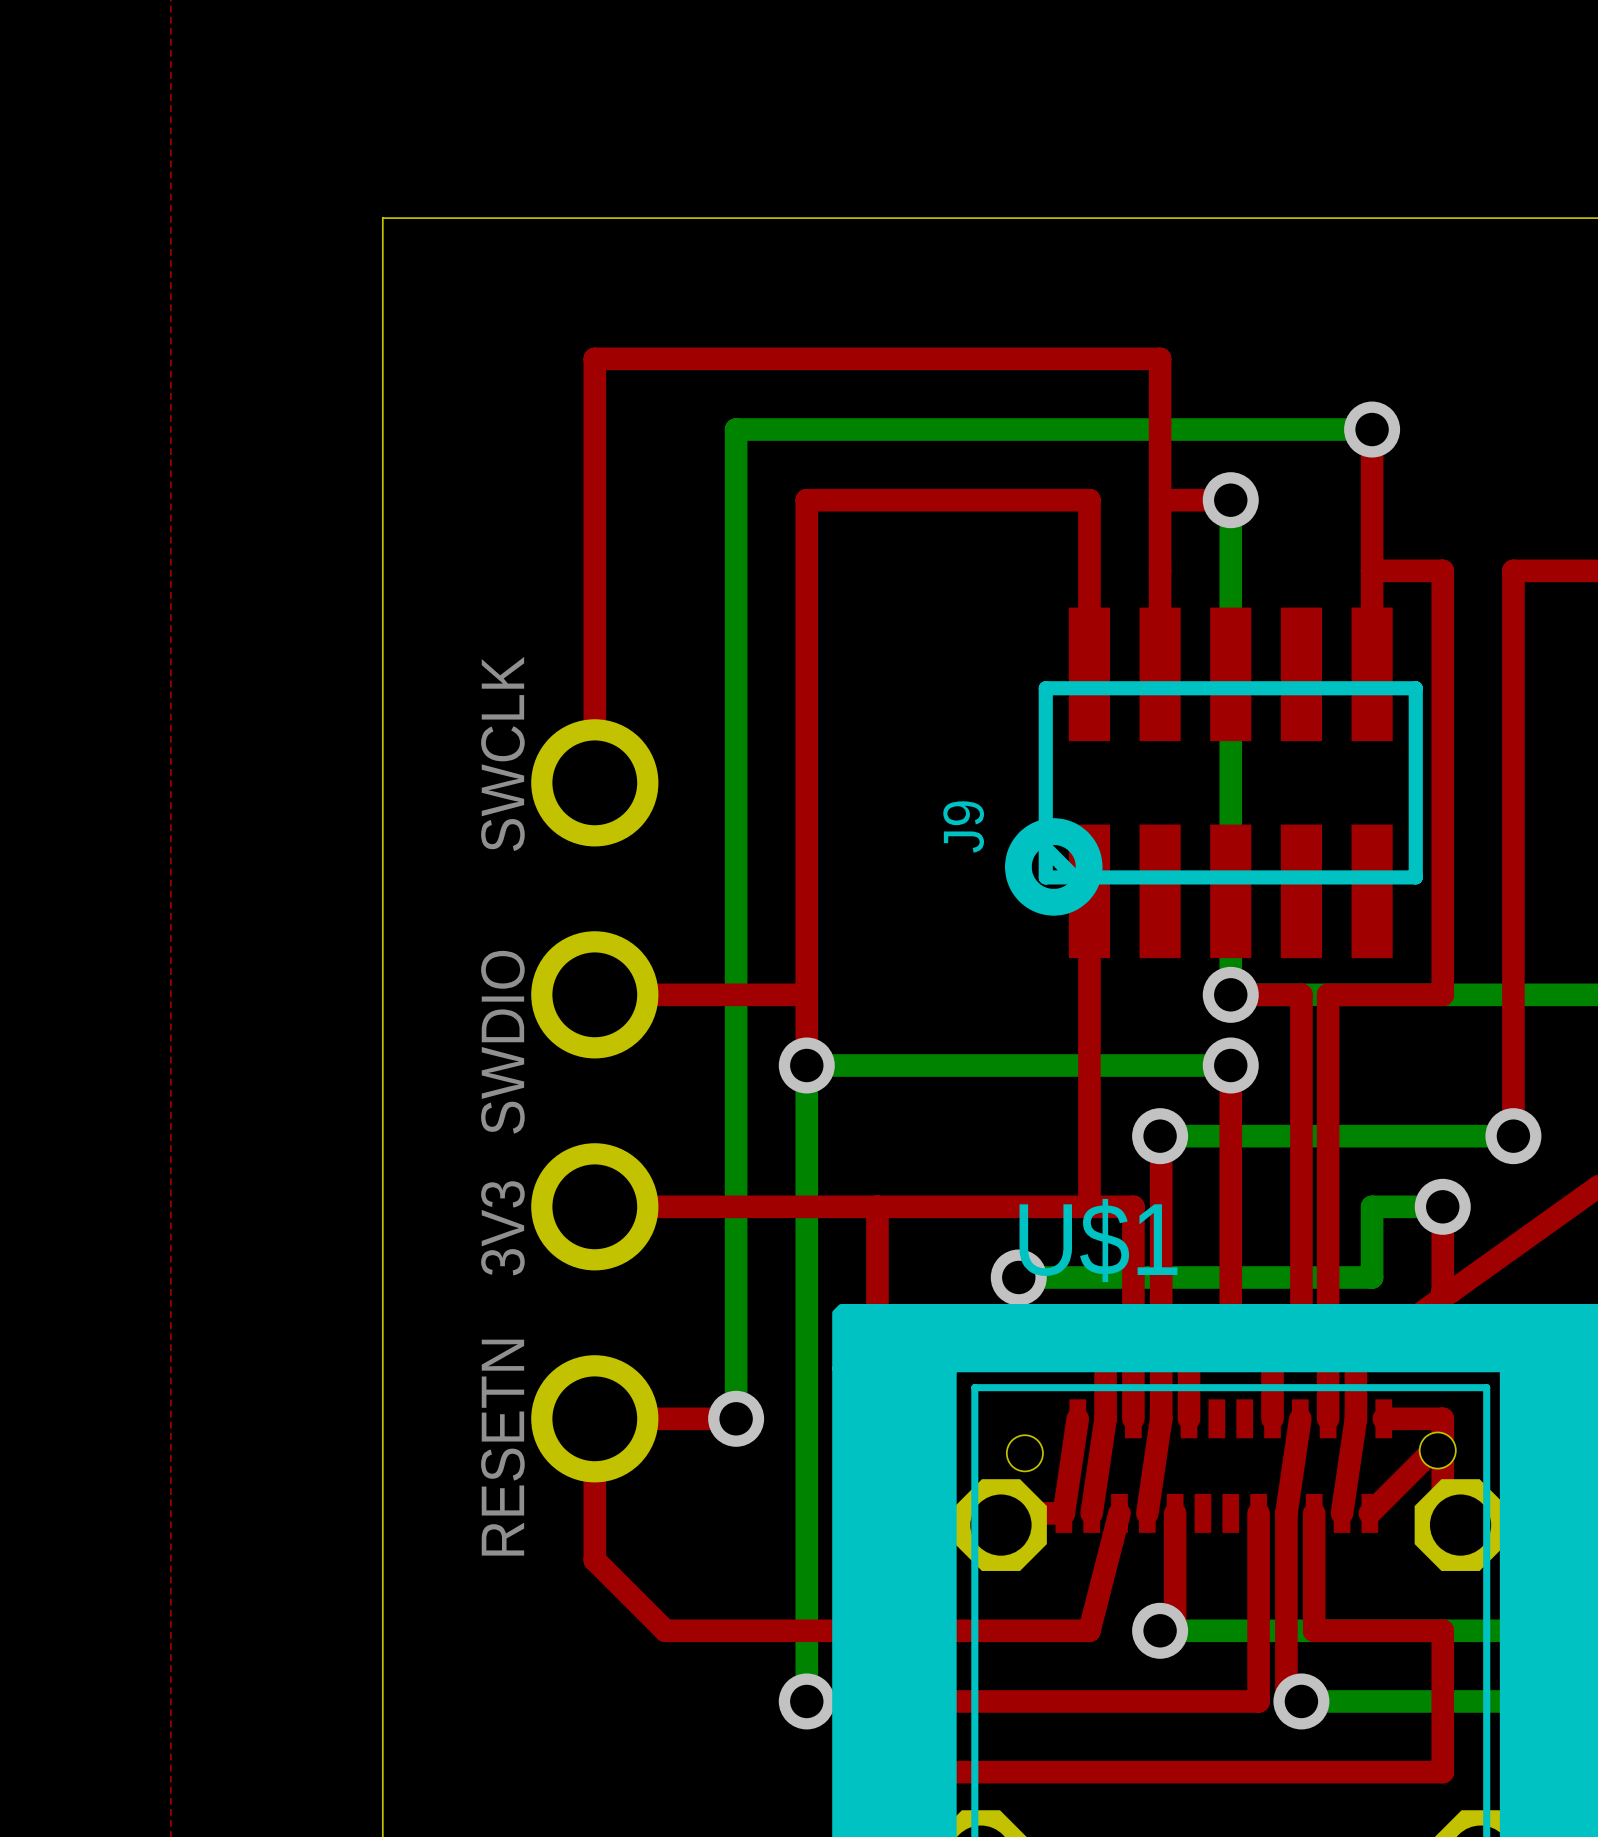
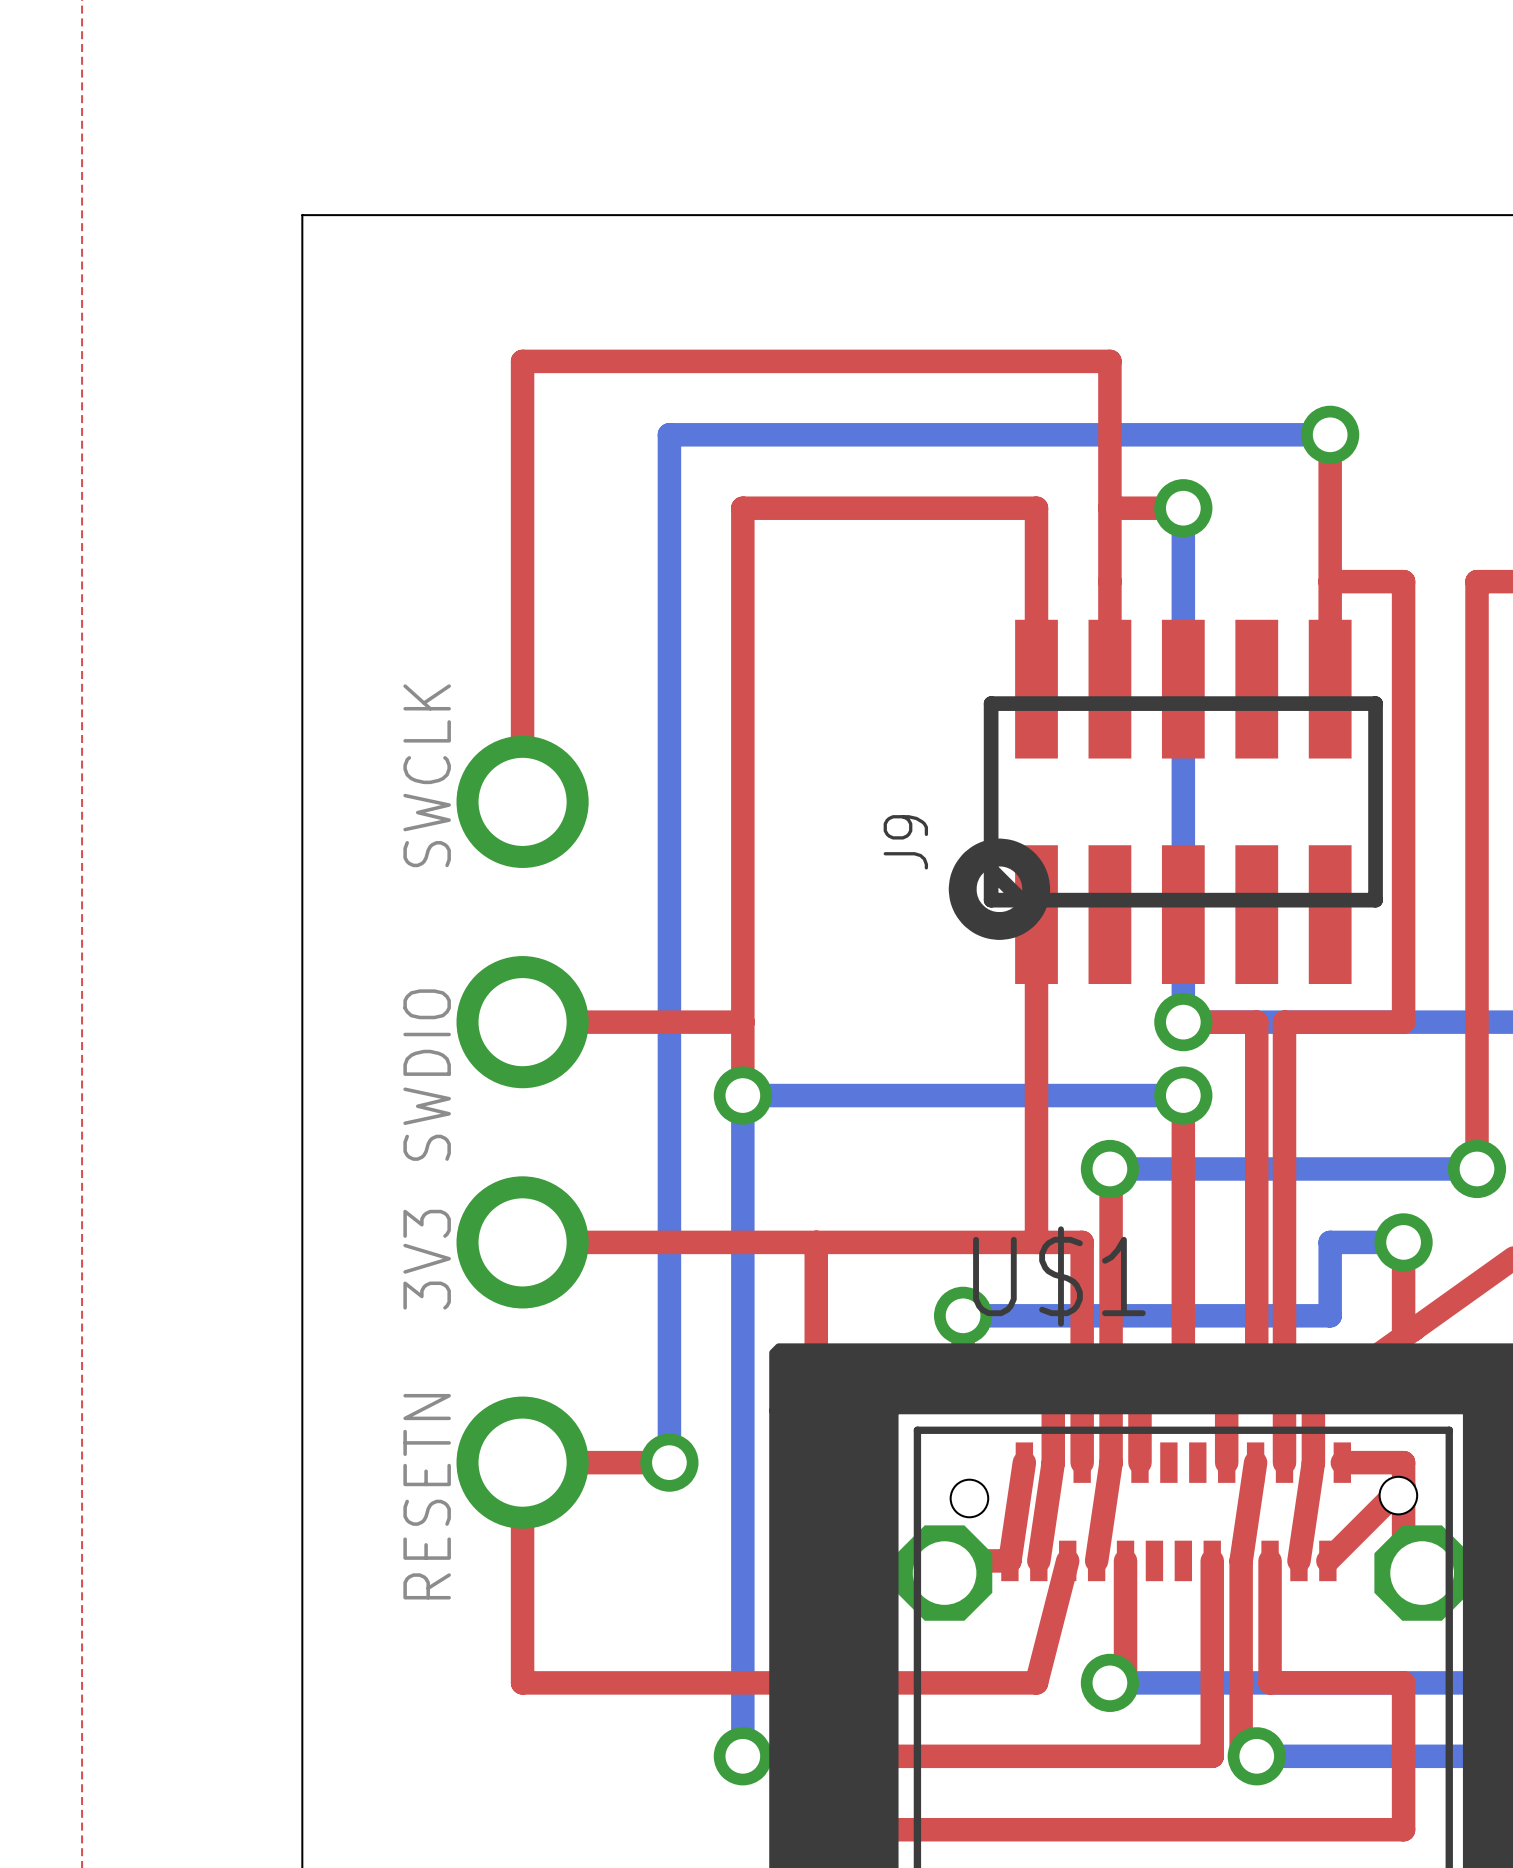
top track: (594, 1560) (665, 1630) -> (522, 1609) (522, 1682) (595, 1682)

